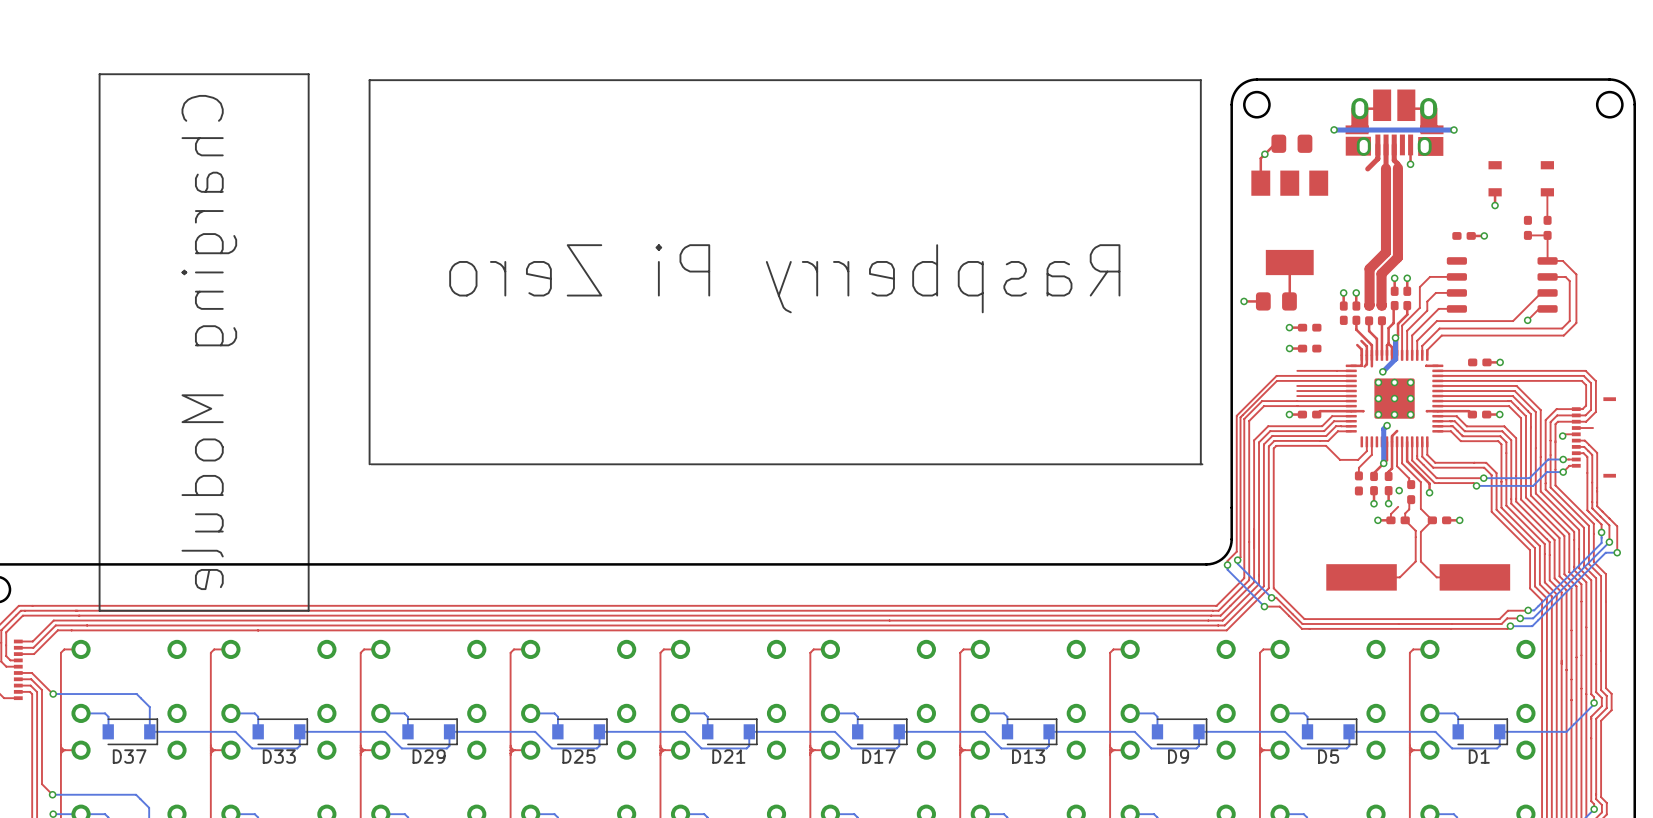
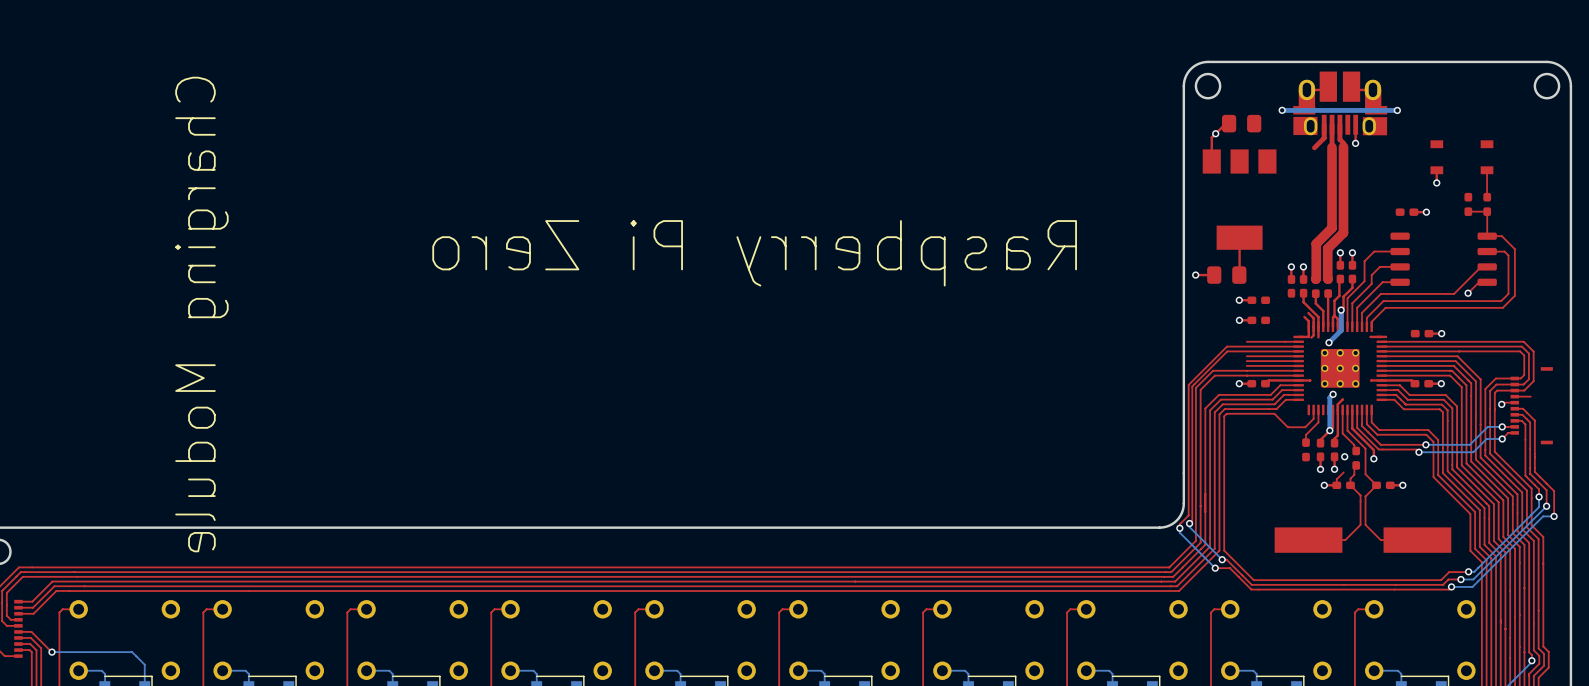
line: (308, 74) (308, 610) (99, 610) (99, 74) (308, 74) -> none
line: (1200, 464) (1200, 80) (369, 80) (369, 464) -> none
line: (1202, 464) (371, 464) -> none

